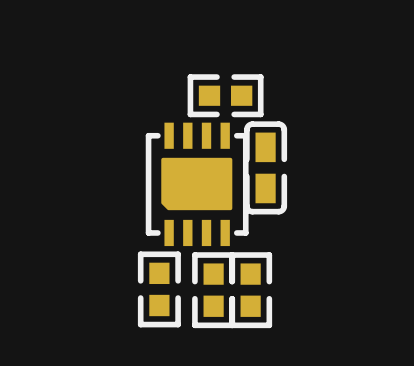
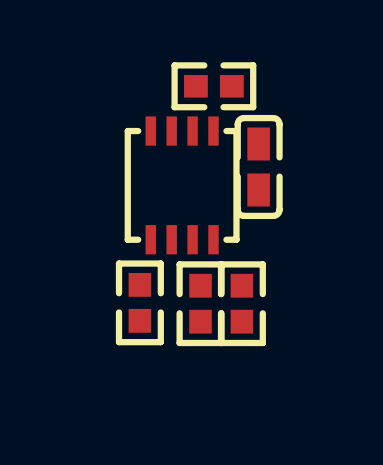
part footprint: [144, 122, 249, 250] -> [123, 116, 240, 258]

